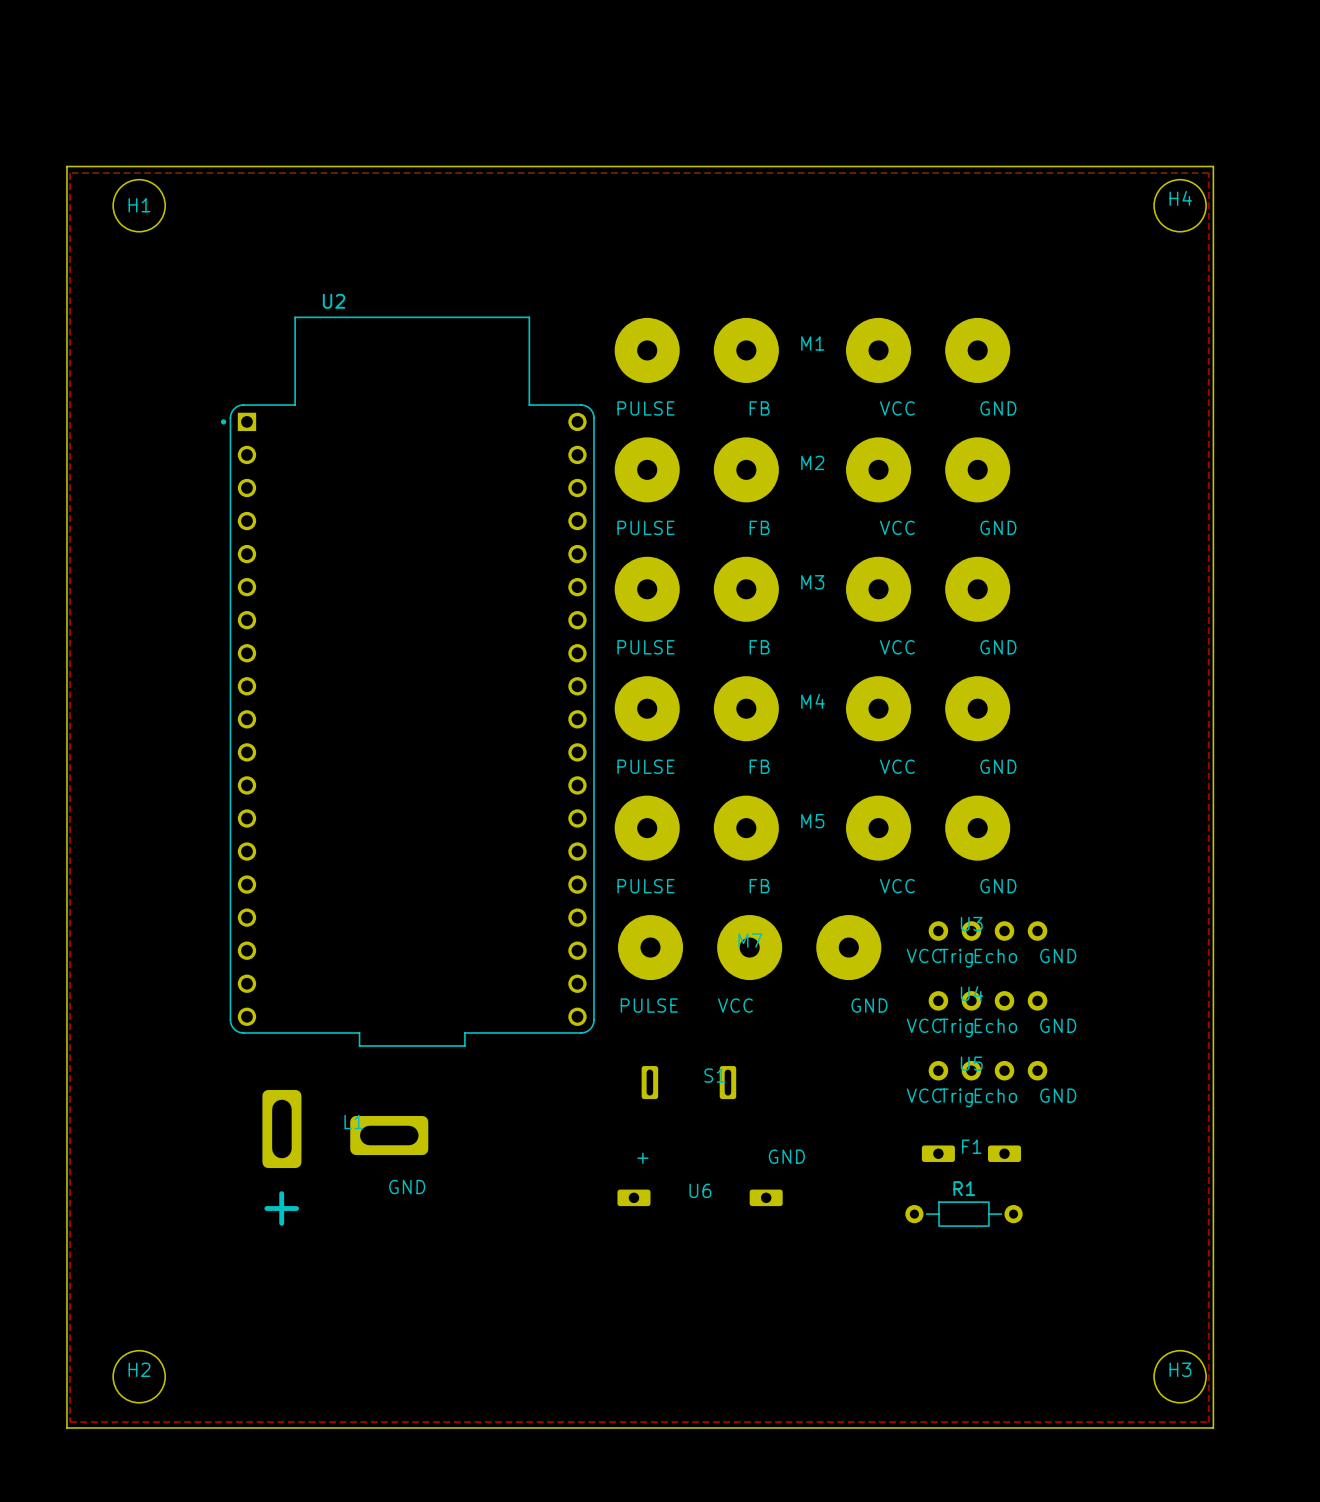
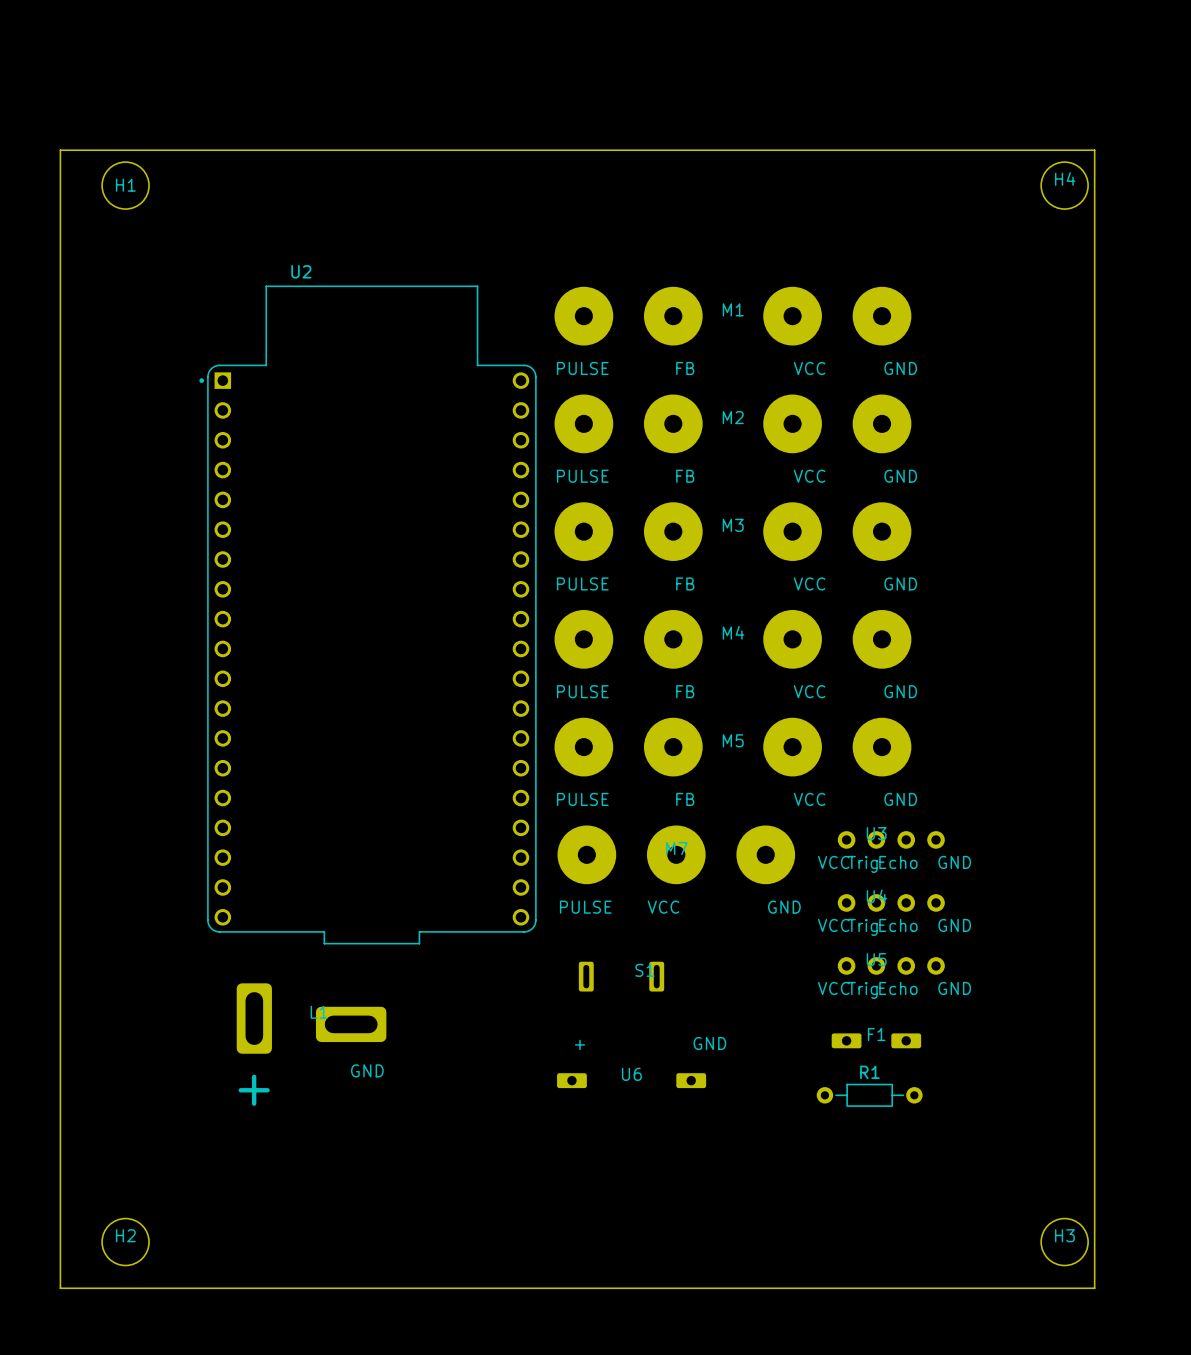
top zone outline: (70, 173) (70, 1422) (1208, 1422) (1208, 173) (70, 173) -> none

